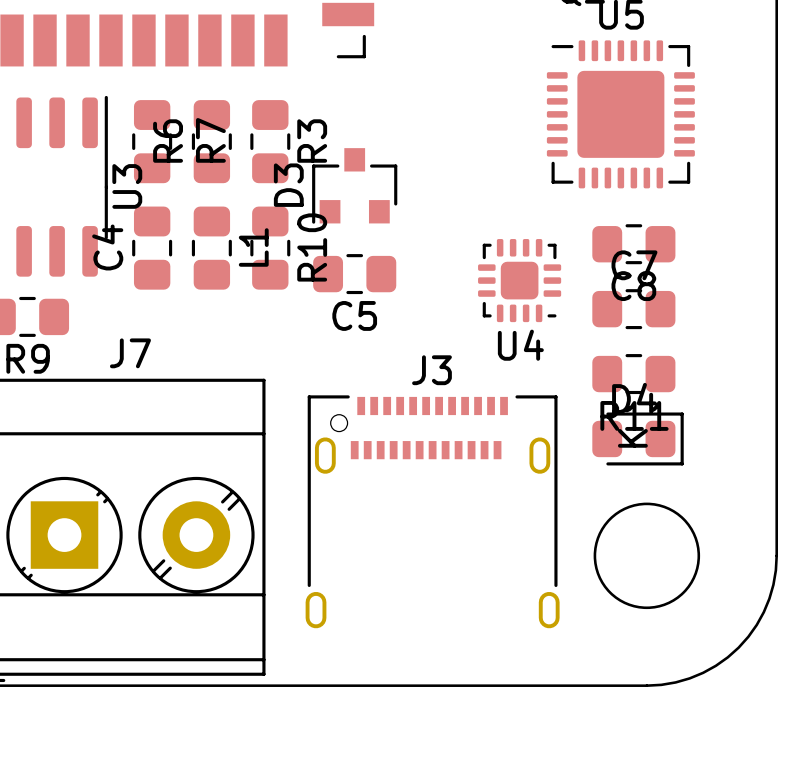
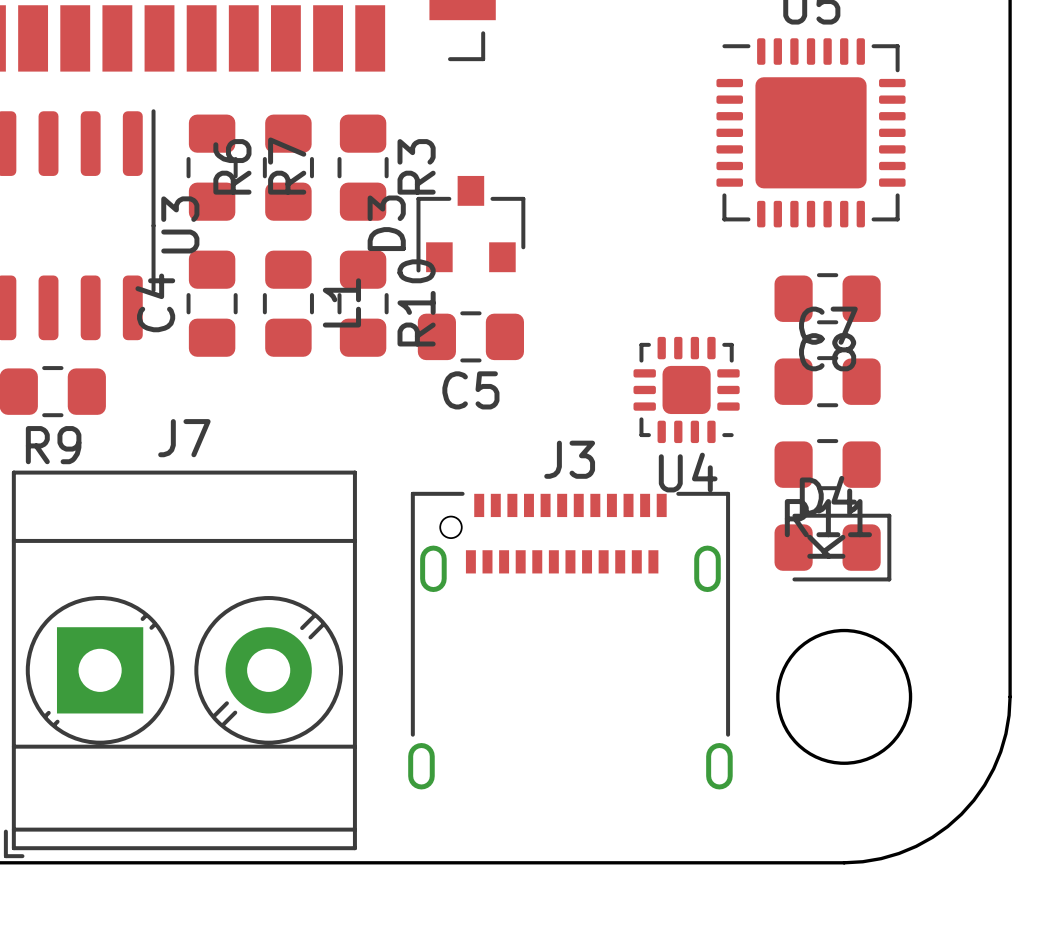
U4 position: (519, 280) -> (686, 389)

